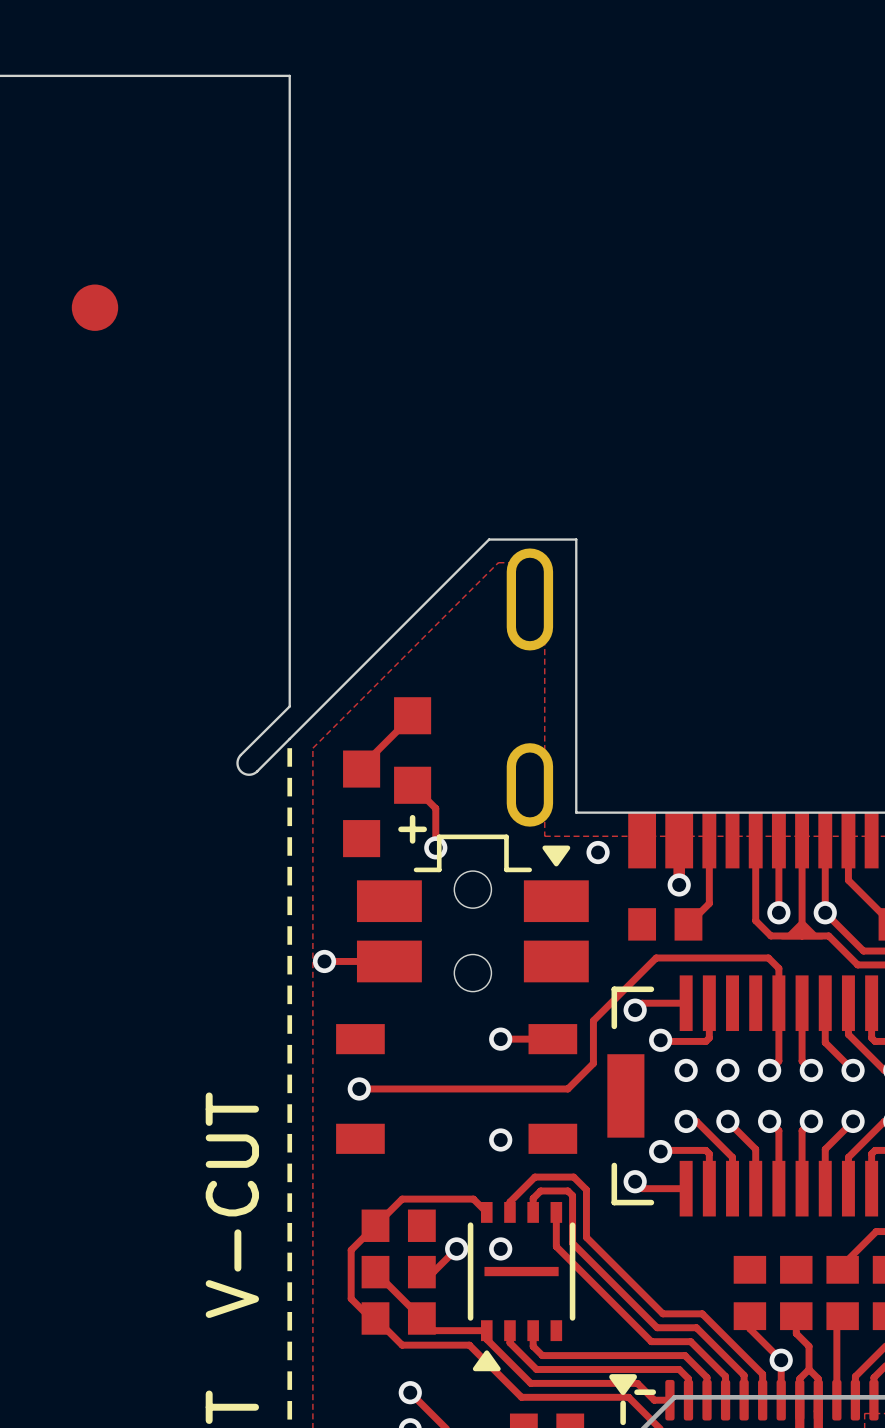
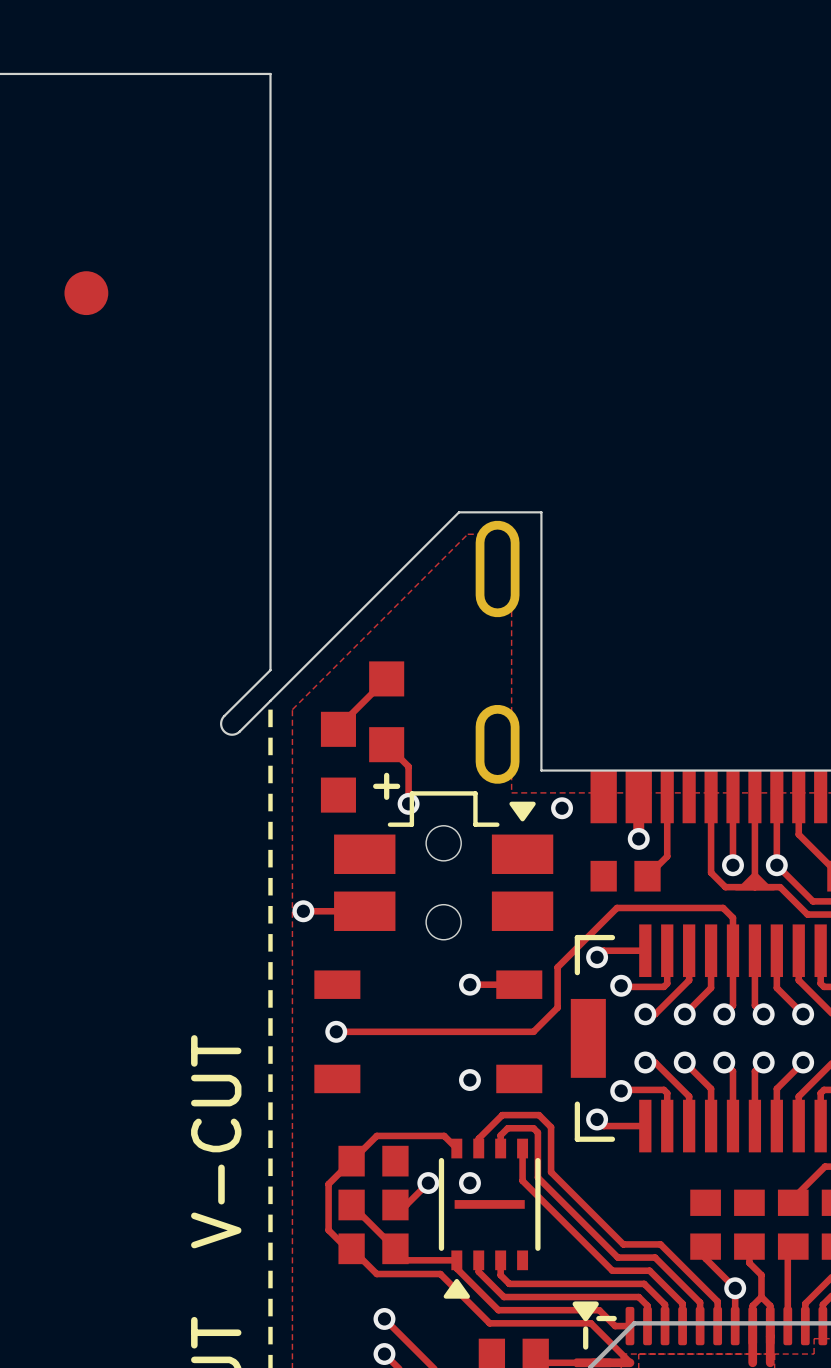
track: none -> (689, 950) (689, 980) (655, 1014) (645, 1014)
track: none -> (711, 950) (711, 987) (684, 1014)

